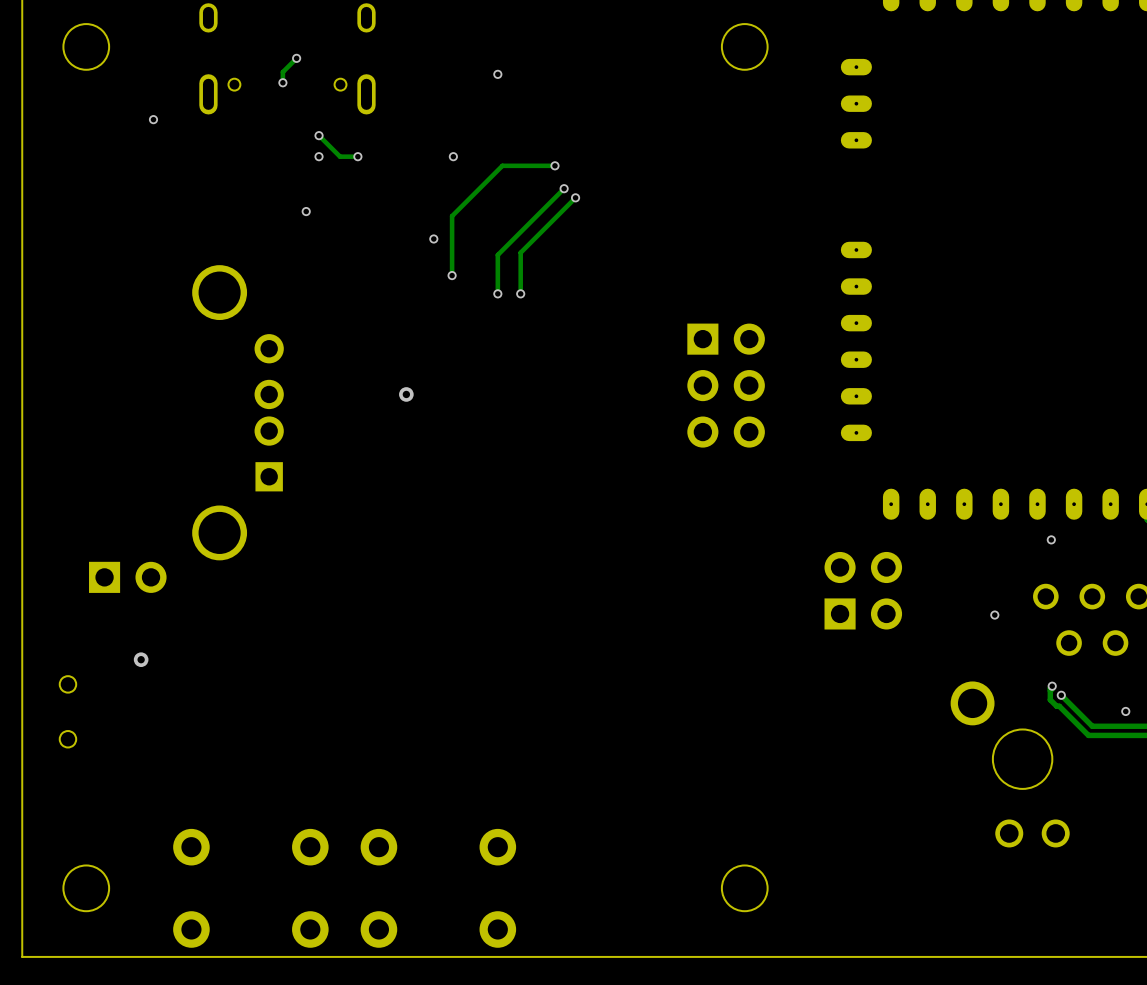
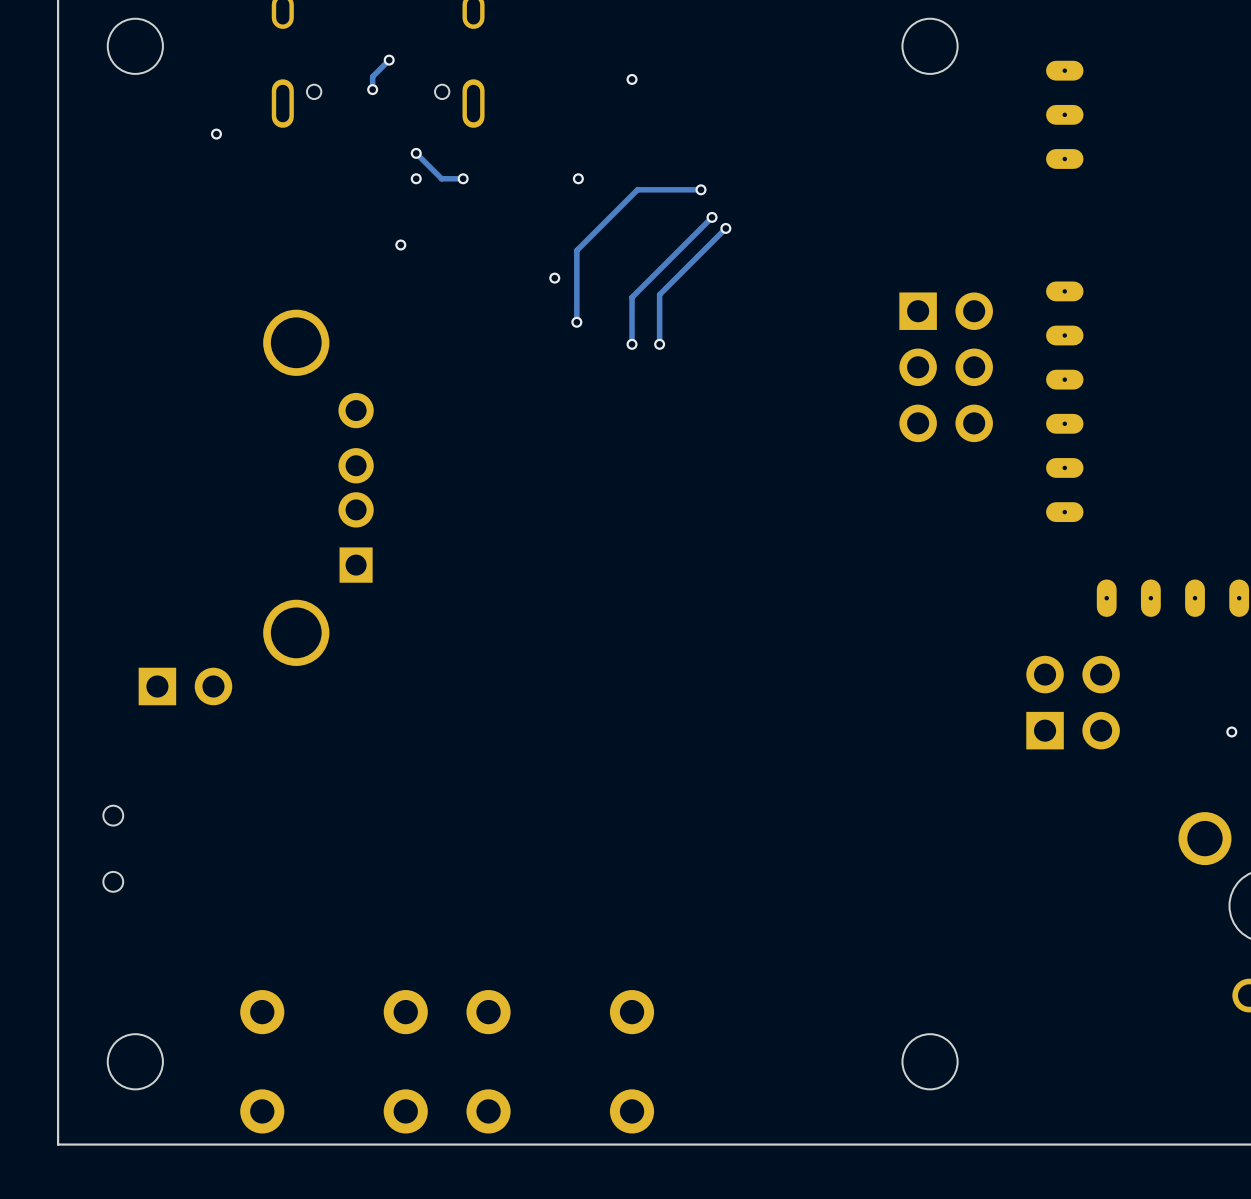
part position: (726, 385) -> (946, 367)
via: (406, 394) -> none
via: (141, 659) -> none

